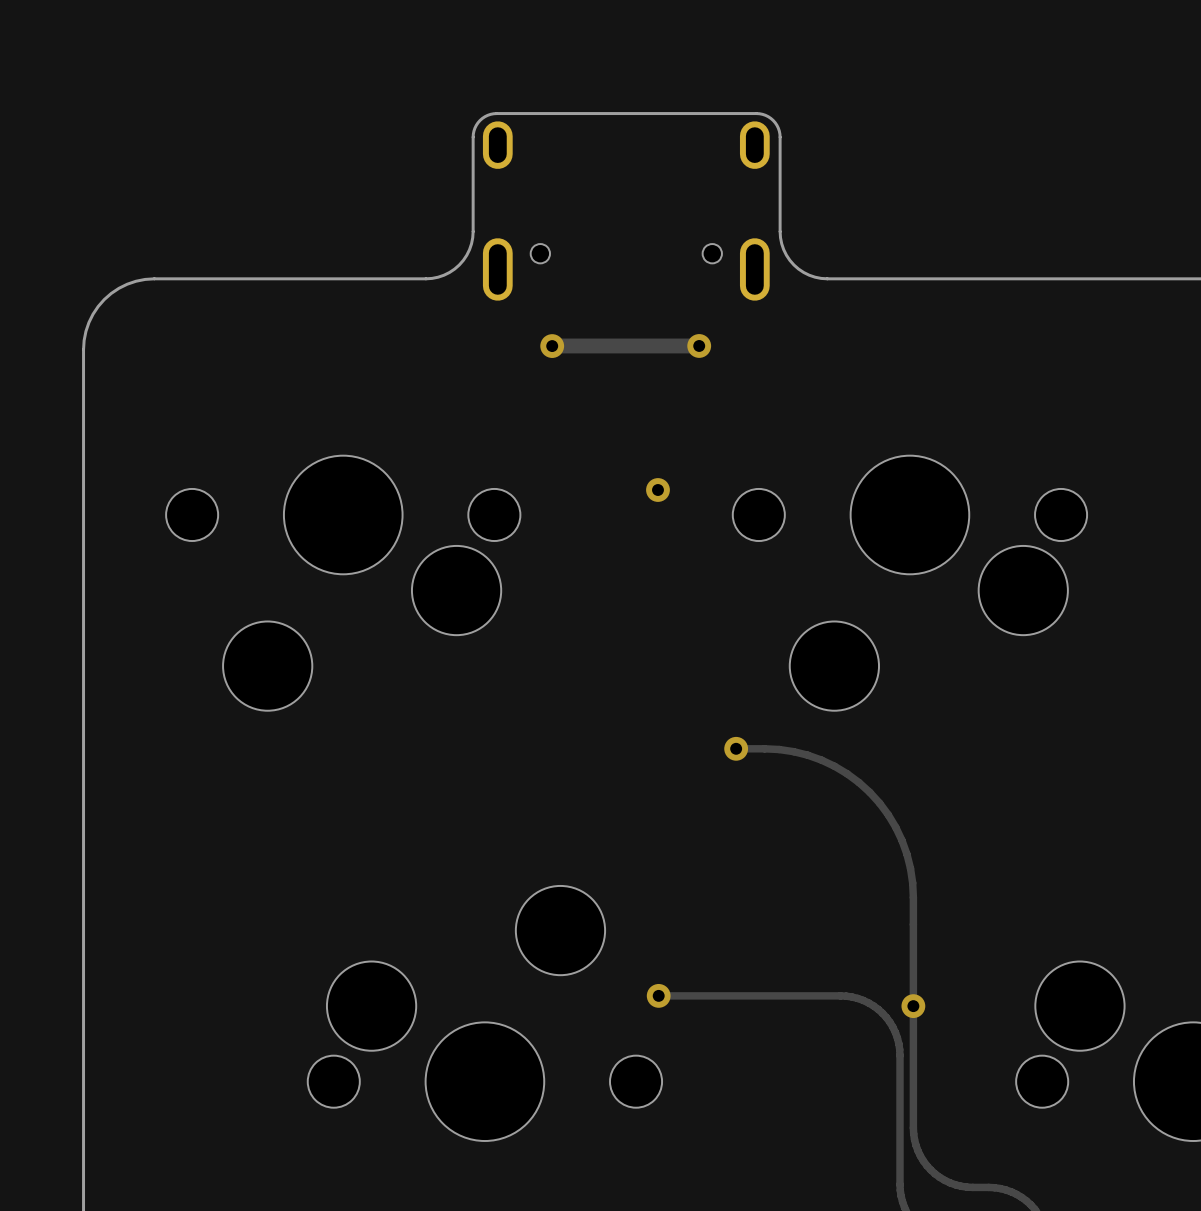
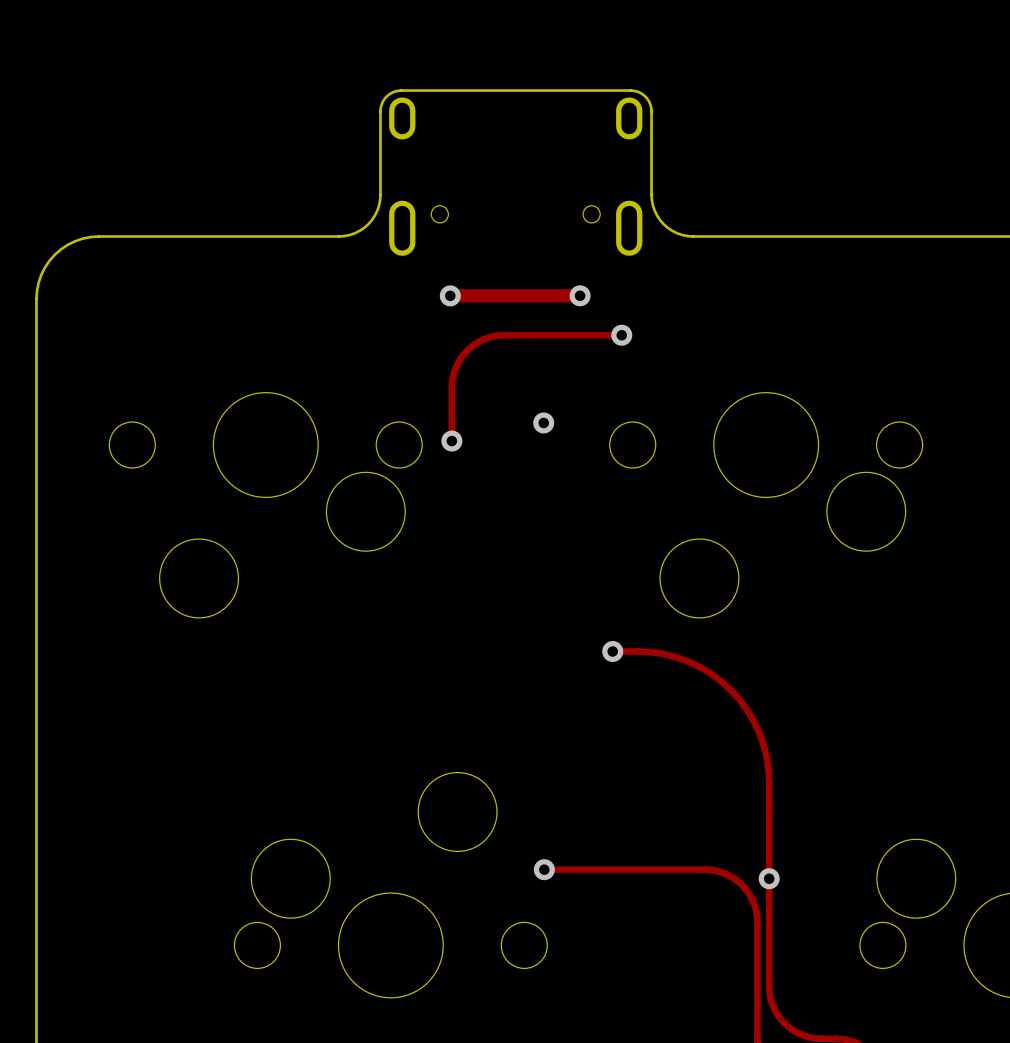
track: none -> (621, 335) (499, 335) (484, 339) (475, 344) (460, 358) (452, 377) (451, 441)
via: none -> (621, 335)
via: none -> (451, 441)

